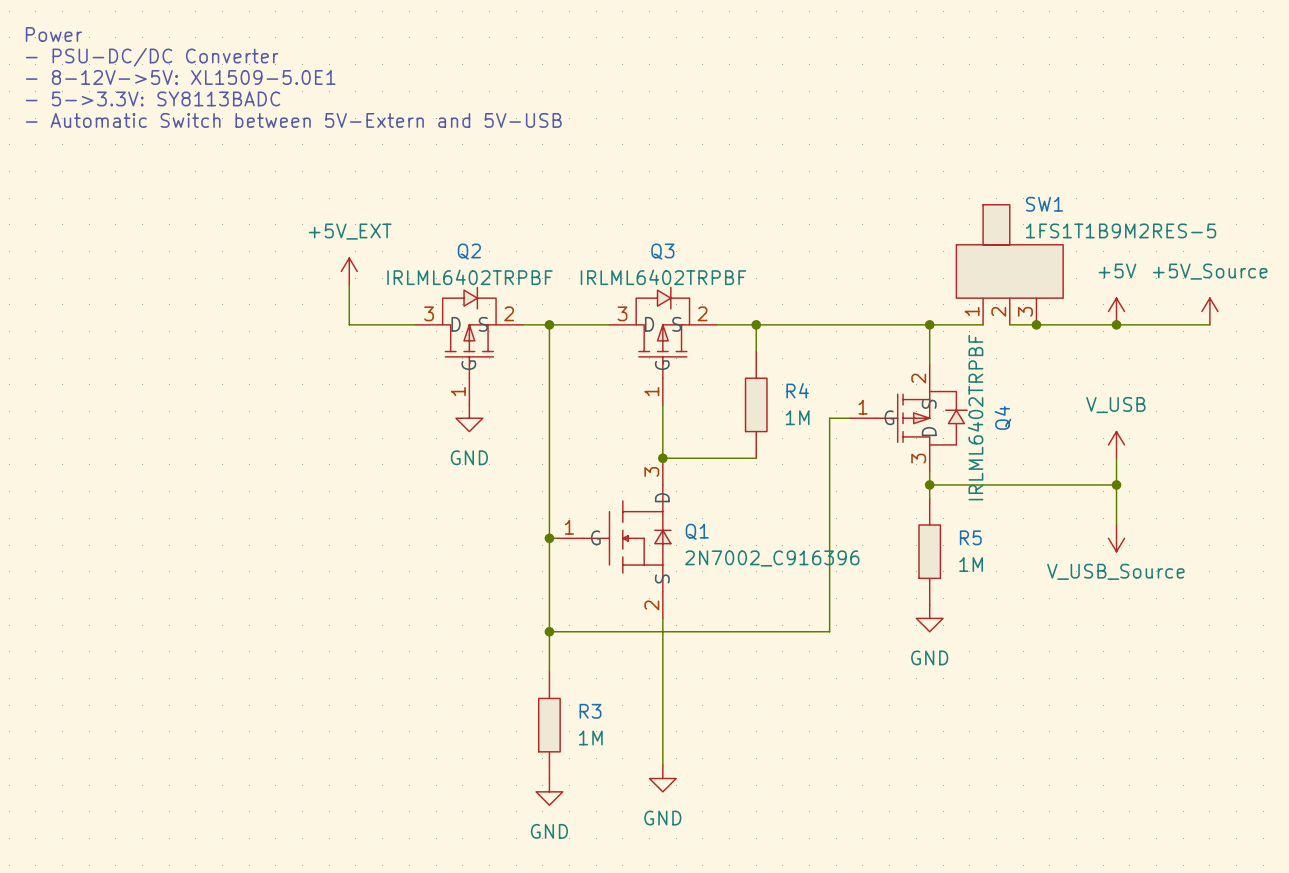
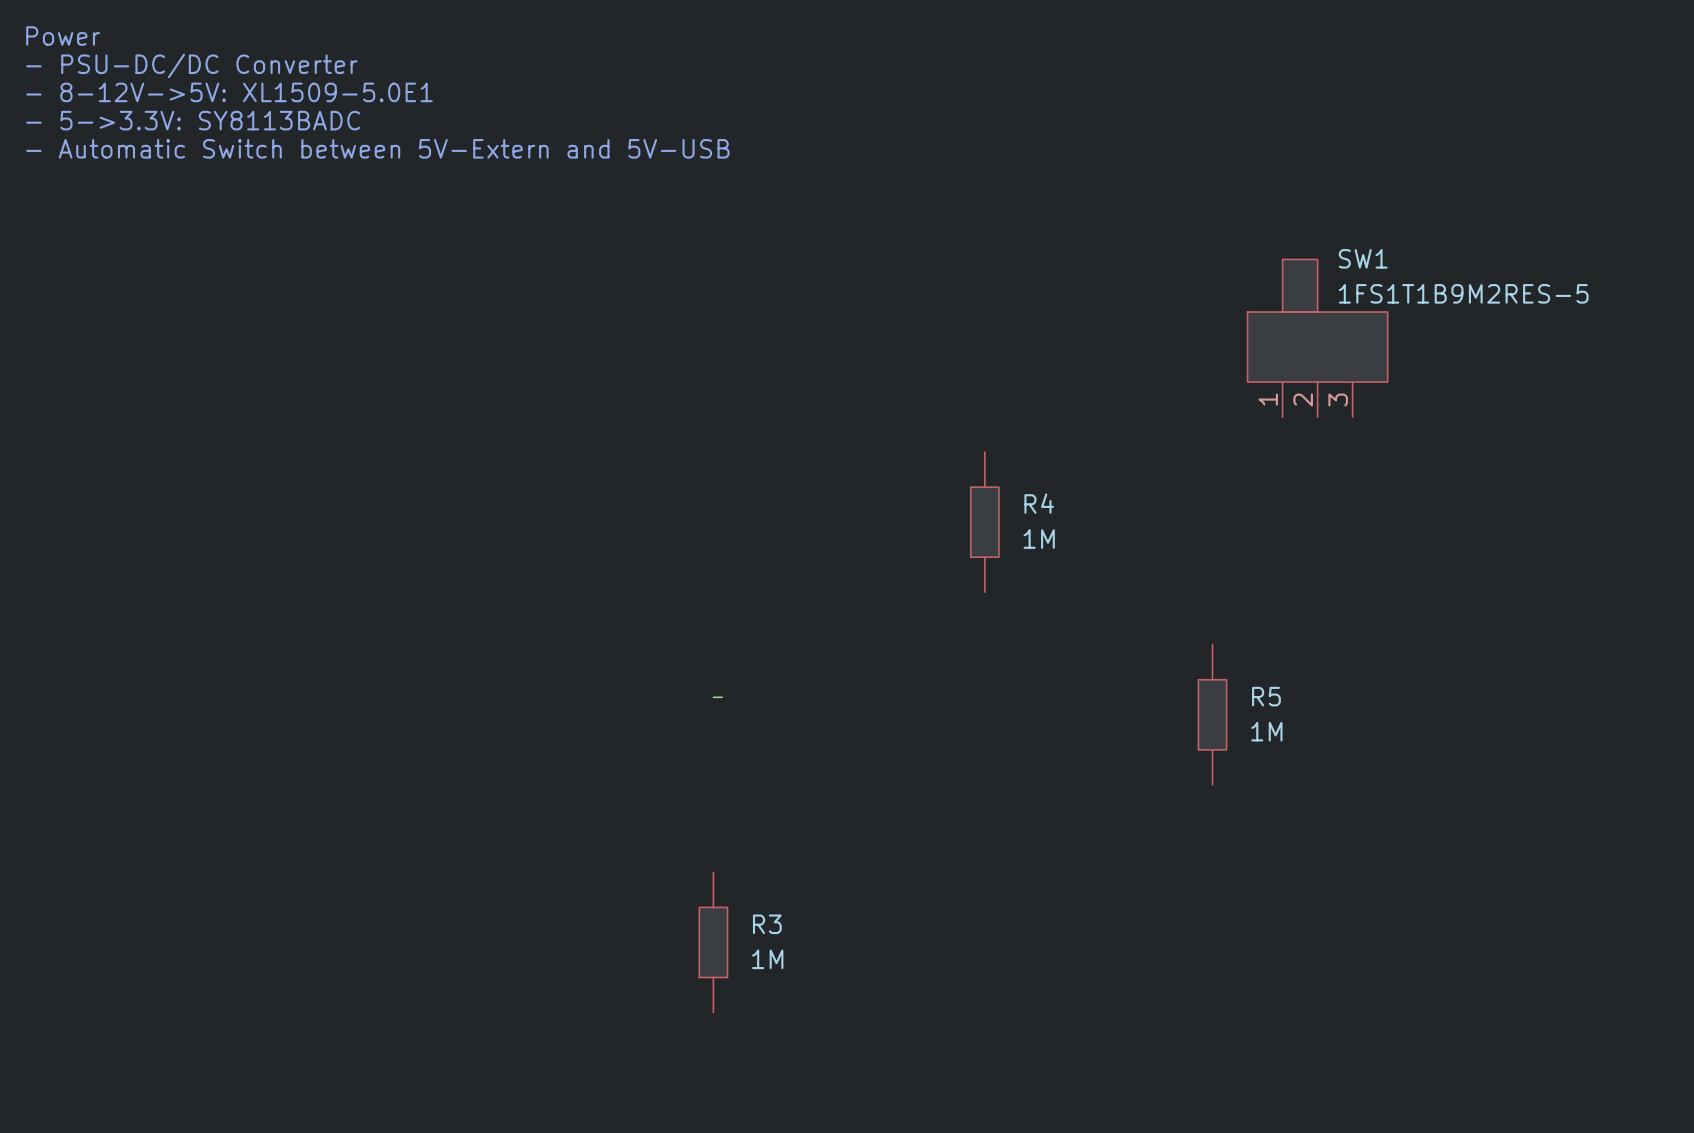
power symbol: +5V_EXT (349, 271) -> none
wire: (349, 284) (349, 324) (415, 324) -> none
power symbol: +5V (1116, 311) -> none
power symbol: +5V_Source (1209, 311) -> none
wire: (522, 324) (609, 324) -> none
wire: (549, 324) (549, 671) -> none
junction: (549, 324) -> none
wire: (716, 324) (983, 324) -> none
wire: (756, 324) (756, 351) -> none
junction: (756, 324) -> none
wire: (929, 324) (929, 364) -> none
junction: (929, 324) -> none
wire: (1009, 324) (1209, 324) -> none
junction: (1036, 324) -> none
junction: (1116, 324) -> none
Q2: IRLML6402TRPBF (469, 346) -> none
Q3: IRLML6402TRPBF (662, 346) -> none
wire: (662, 404) (662, 458) (756, 458) -> none
power symbol: GND (469, 418) -> none
wire: (849, 418) (829, 418) (829, 631) (549, 631) -> none
Q4: IRLML6402TRPBF (908, 418) -> none
power symbol: V_USB (1116, 444) -> none
junction: (662, 458) -> none
wire: (1116, 458) (1116, 525) -> none
wire: (929, 471) (929, 498) -> none
wire: (929, 484) (1116, 484) -> none
junction: (929, 484) -> none
junction: (1116, 484) -> none
junction: (549, 538) -> none
Q1: 2N7002_C916396 (613, 538) -> none
power symbol: V_USB_Source (1116, 538) -> none
wire: (662, 618) (662, 765) -> none
power symbol: GND (929, 618) -> none
junction: (549, 631) -> none
power symbol: GND (662, 778) -> none
power symbol: GND (549, 791) -> none

